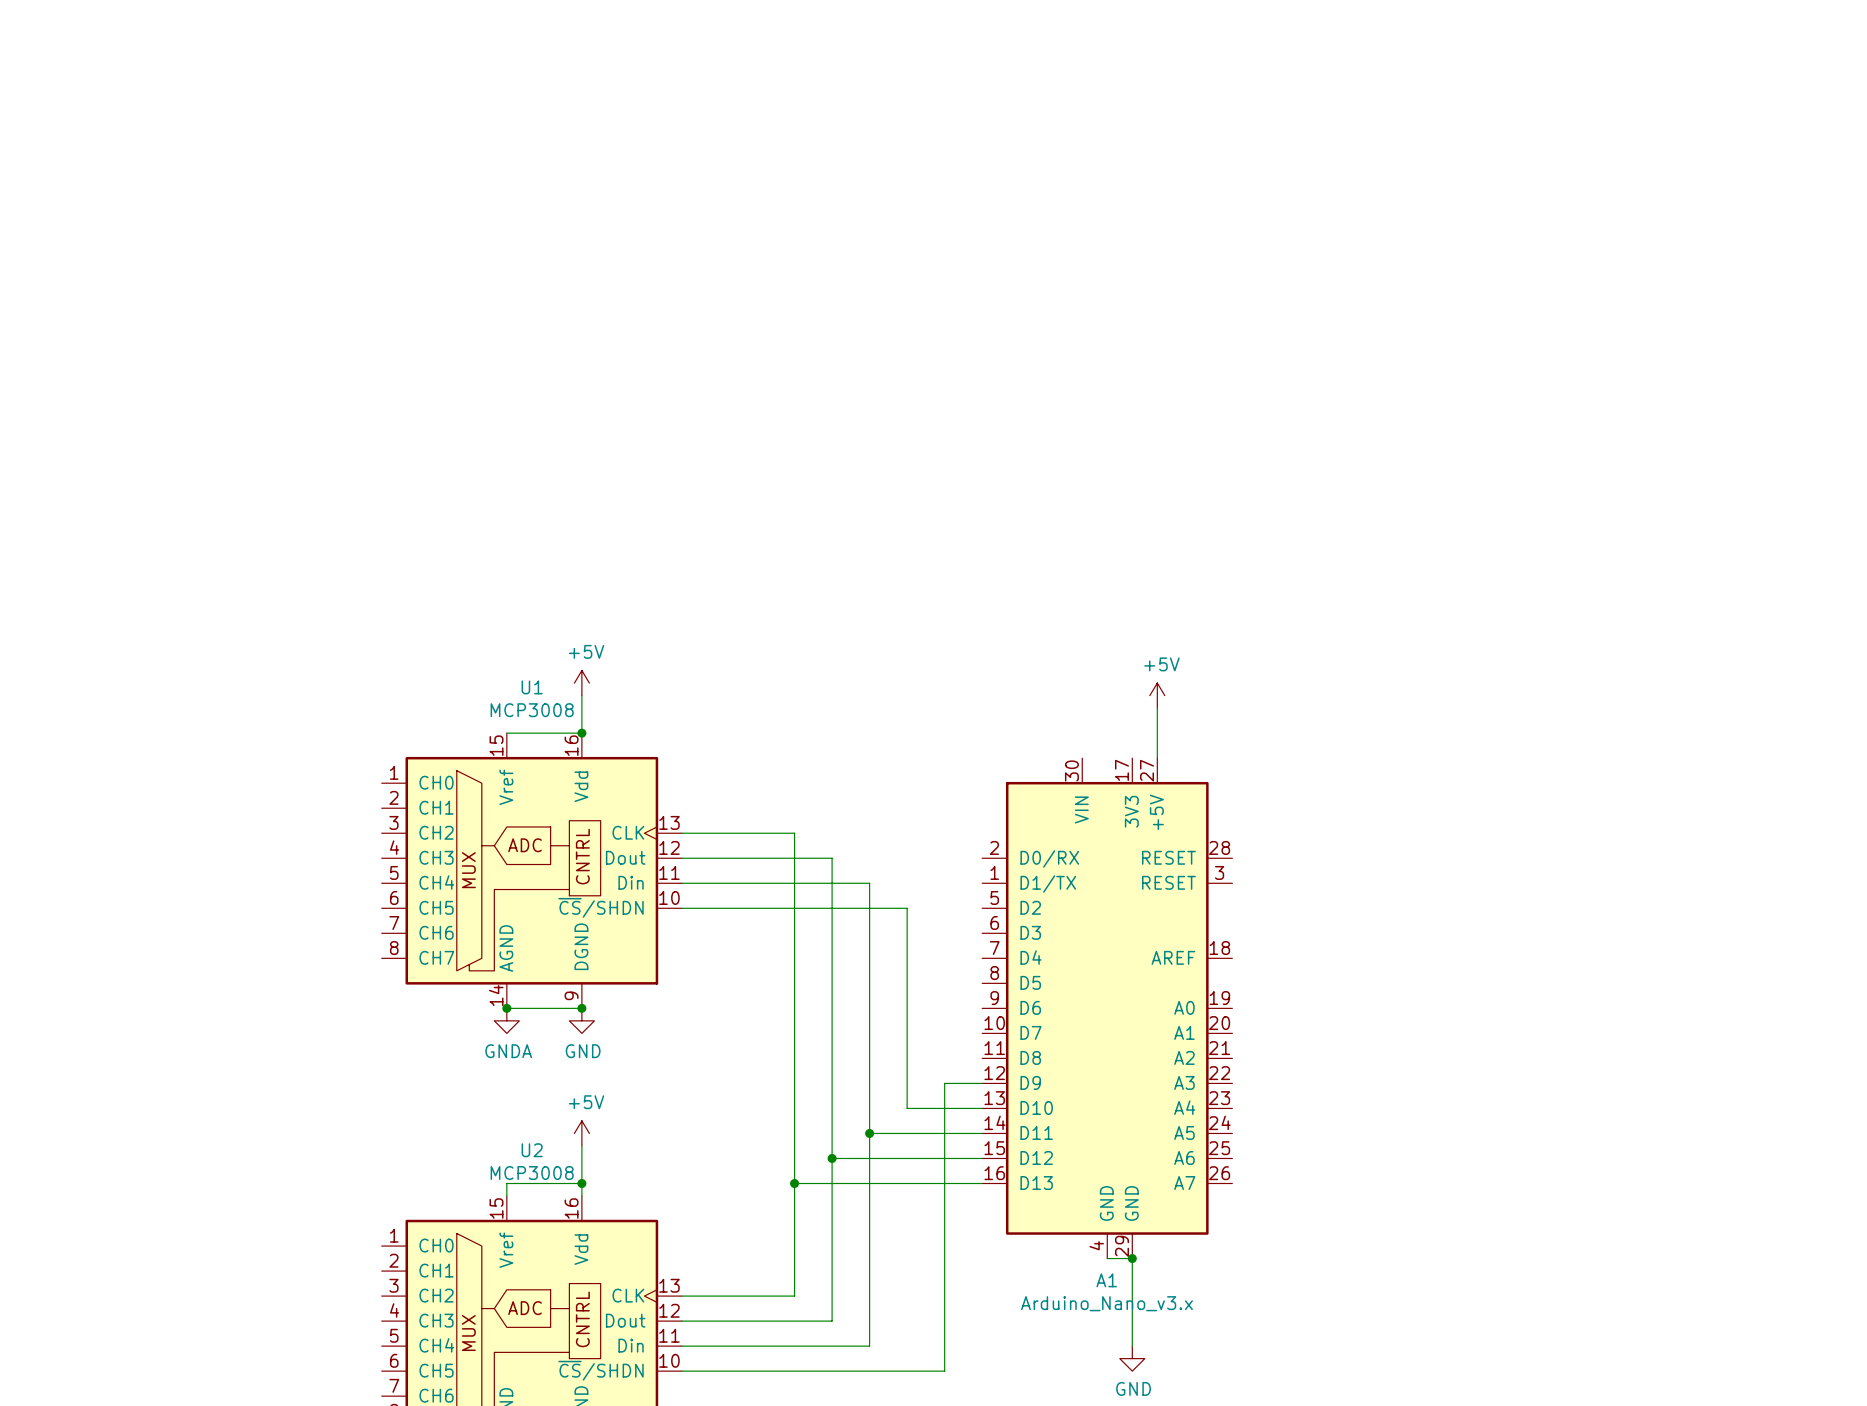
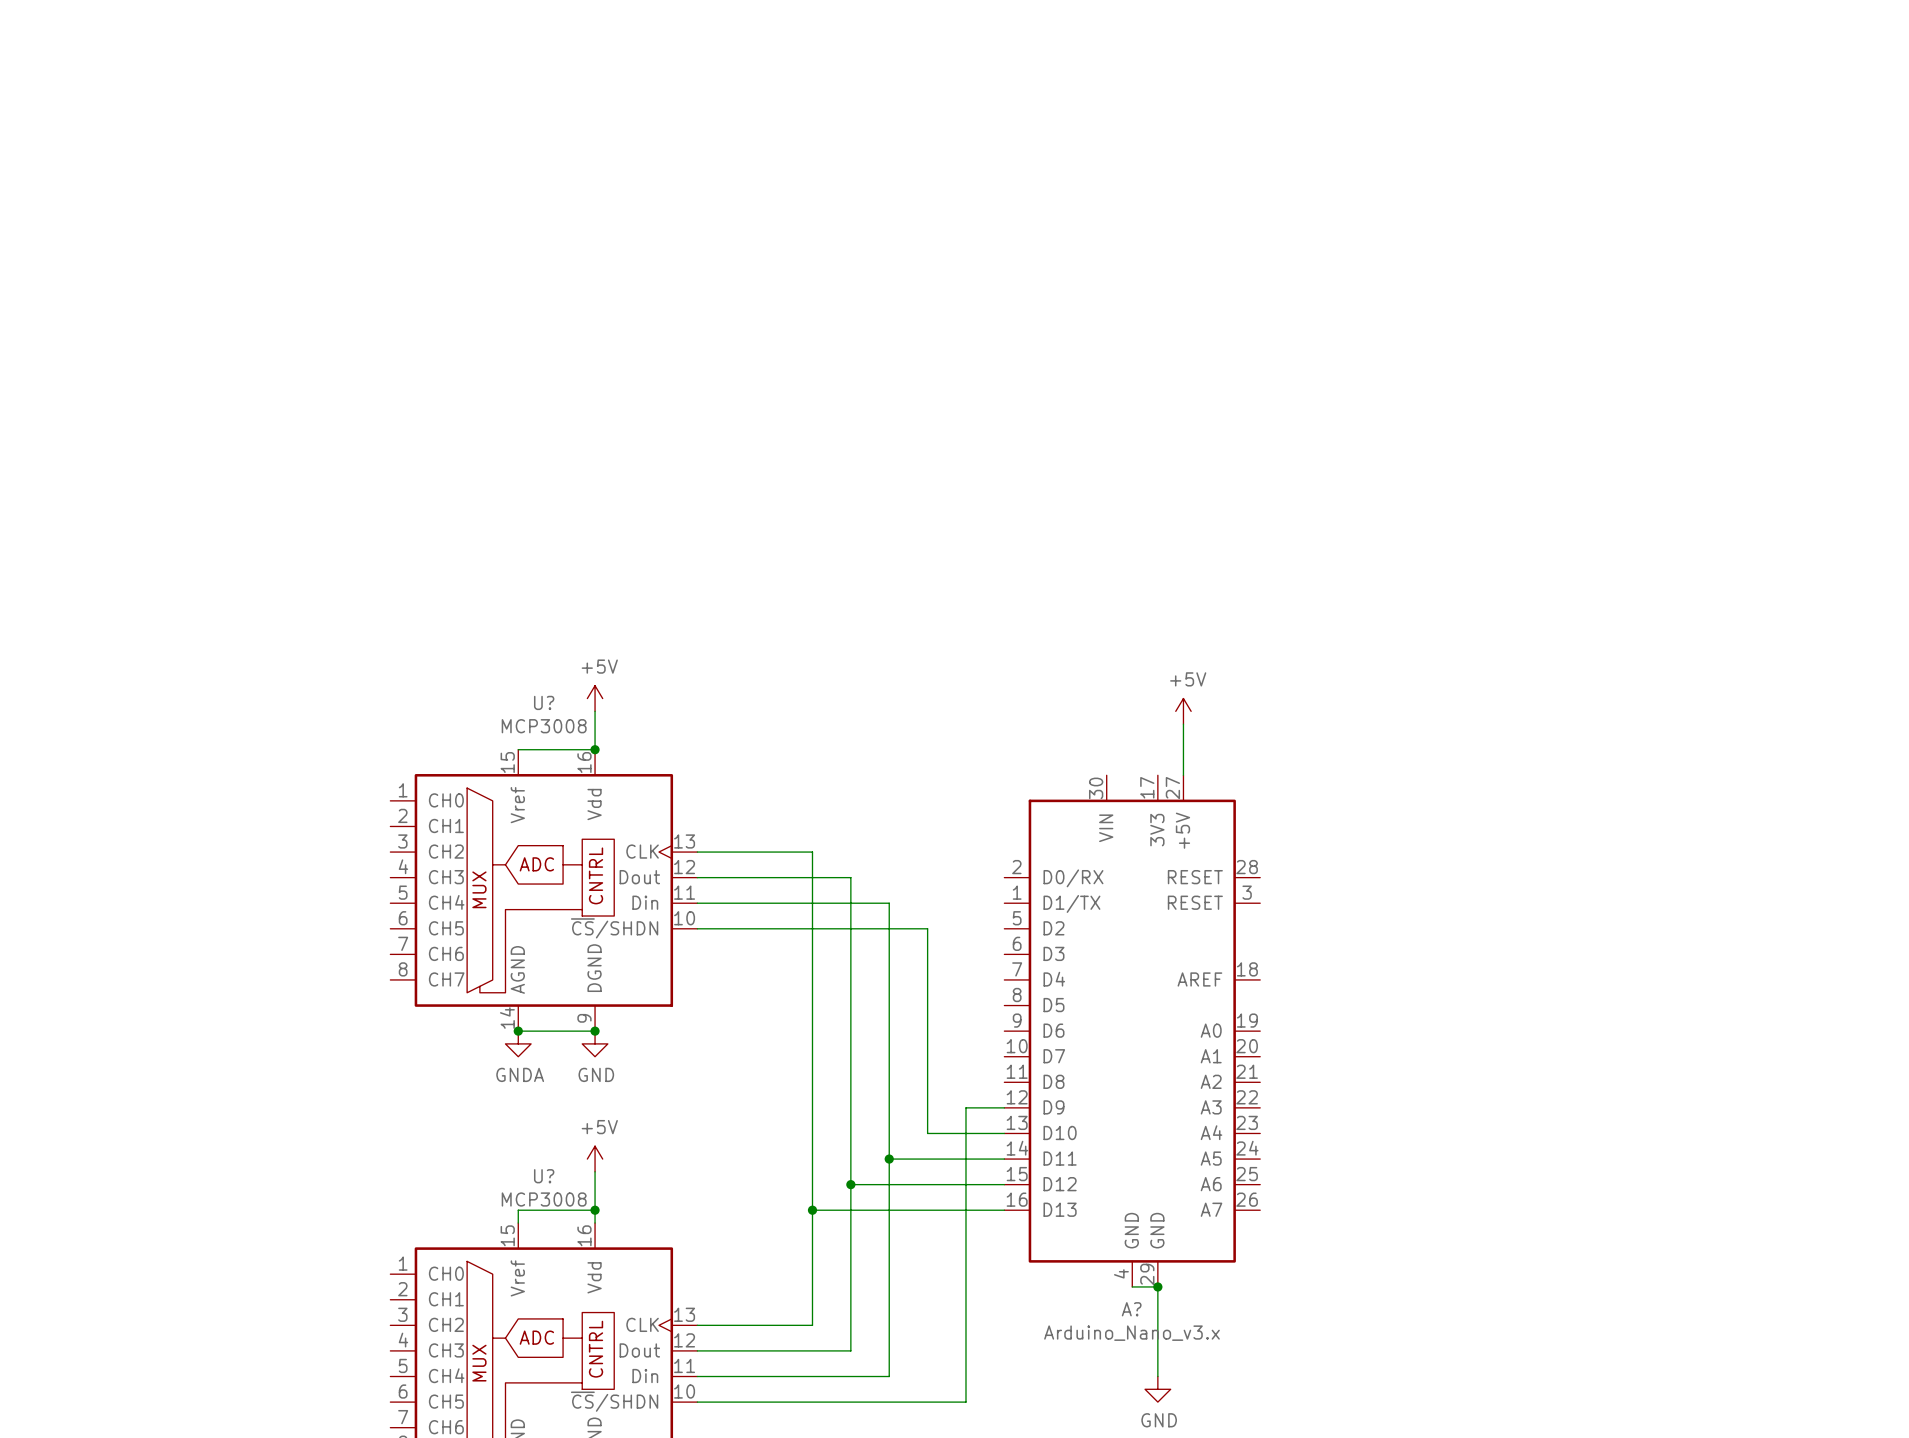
U1 name: U1 (532, 687) -> U? (544, 702)
U2 name: U2 (532, 1150) -> U? (544, 1176)
A1 name: A1 (1106, 1280) -> A? (1131, 1309)

